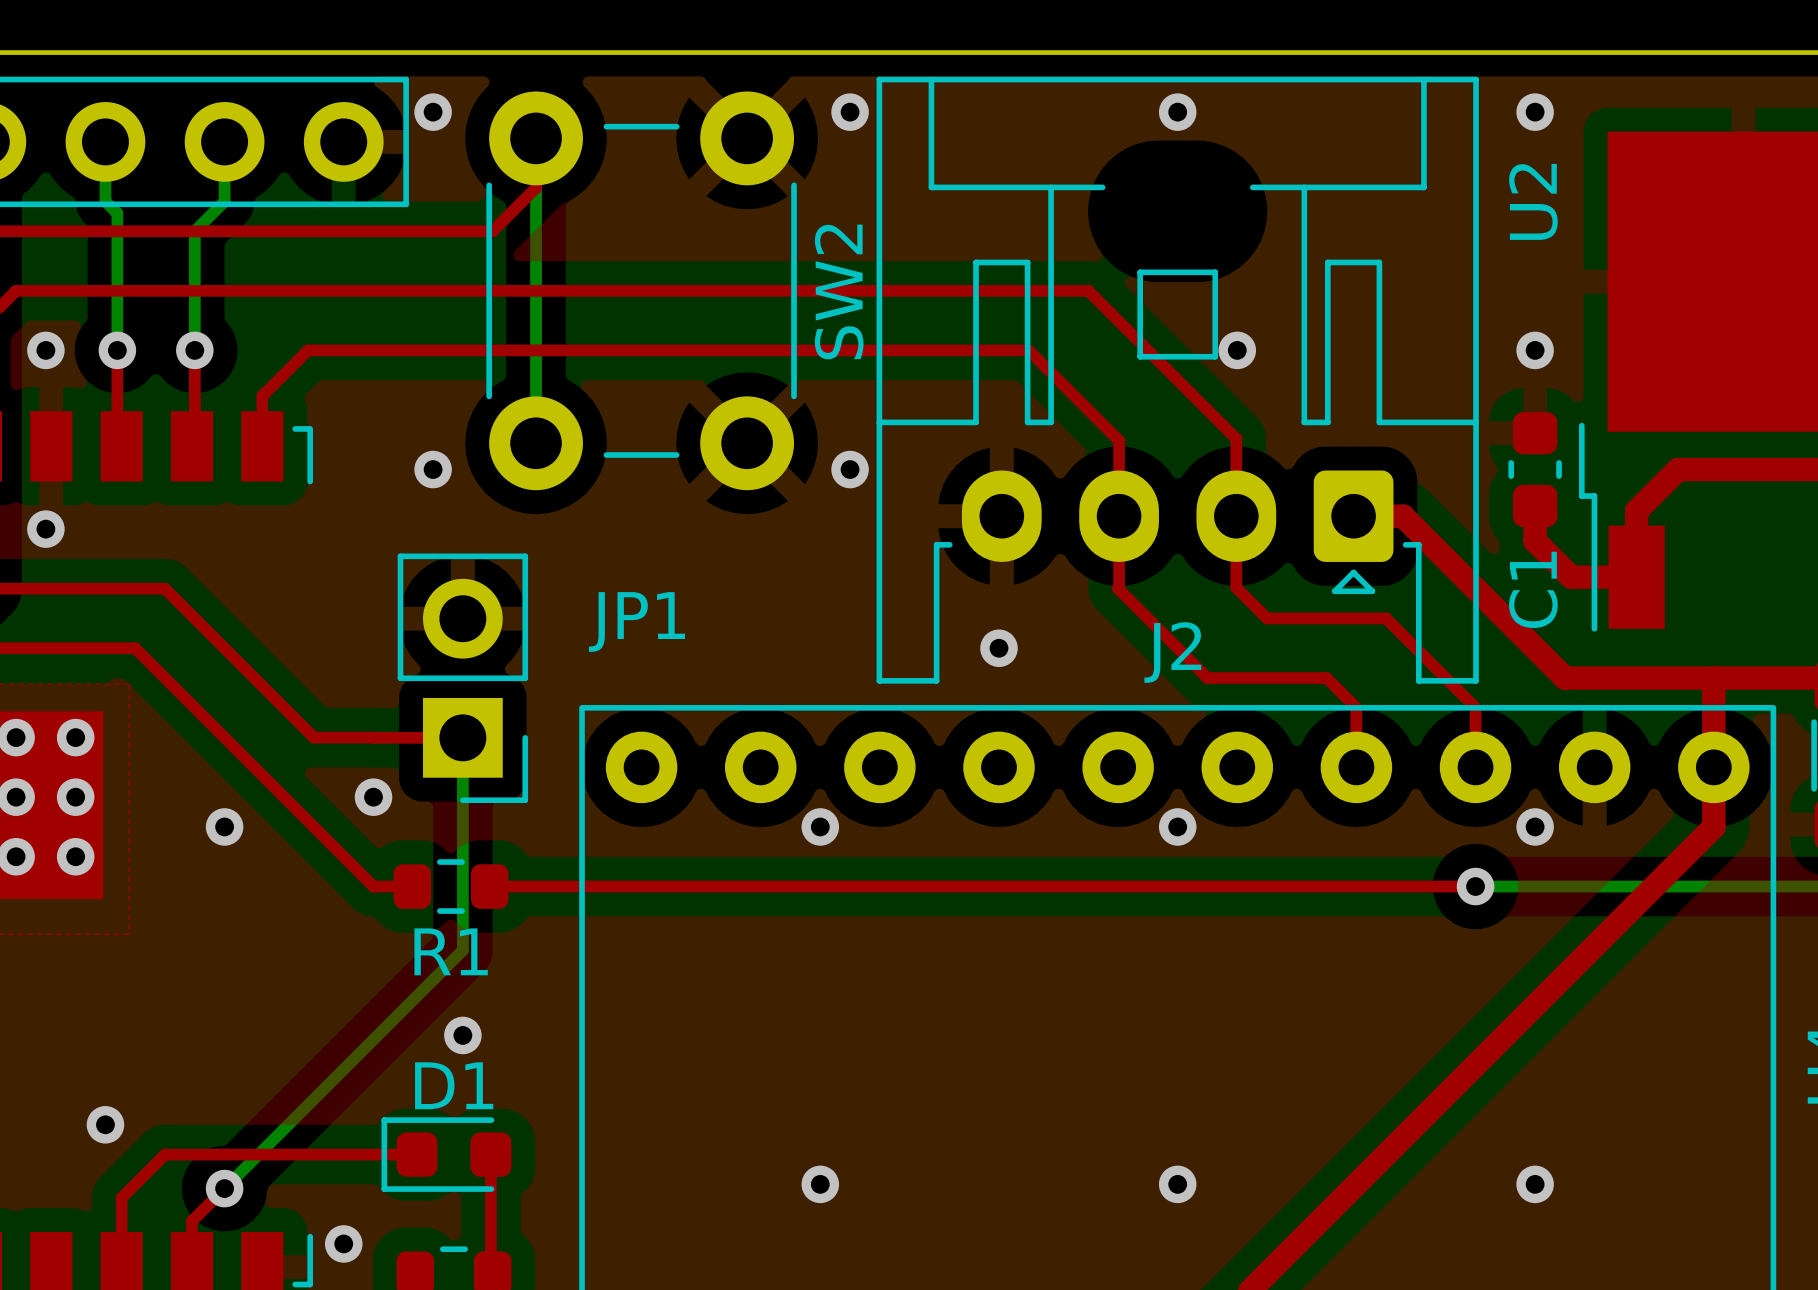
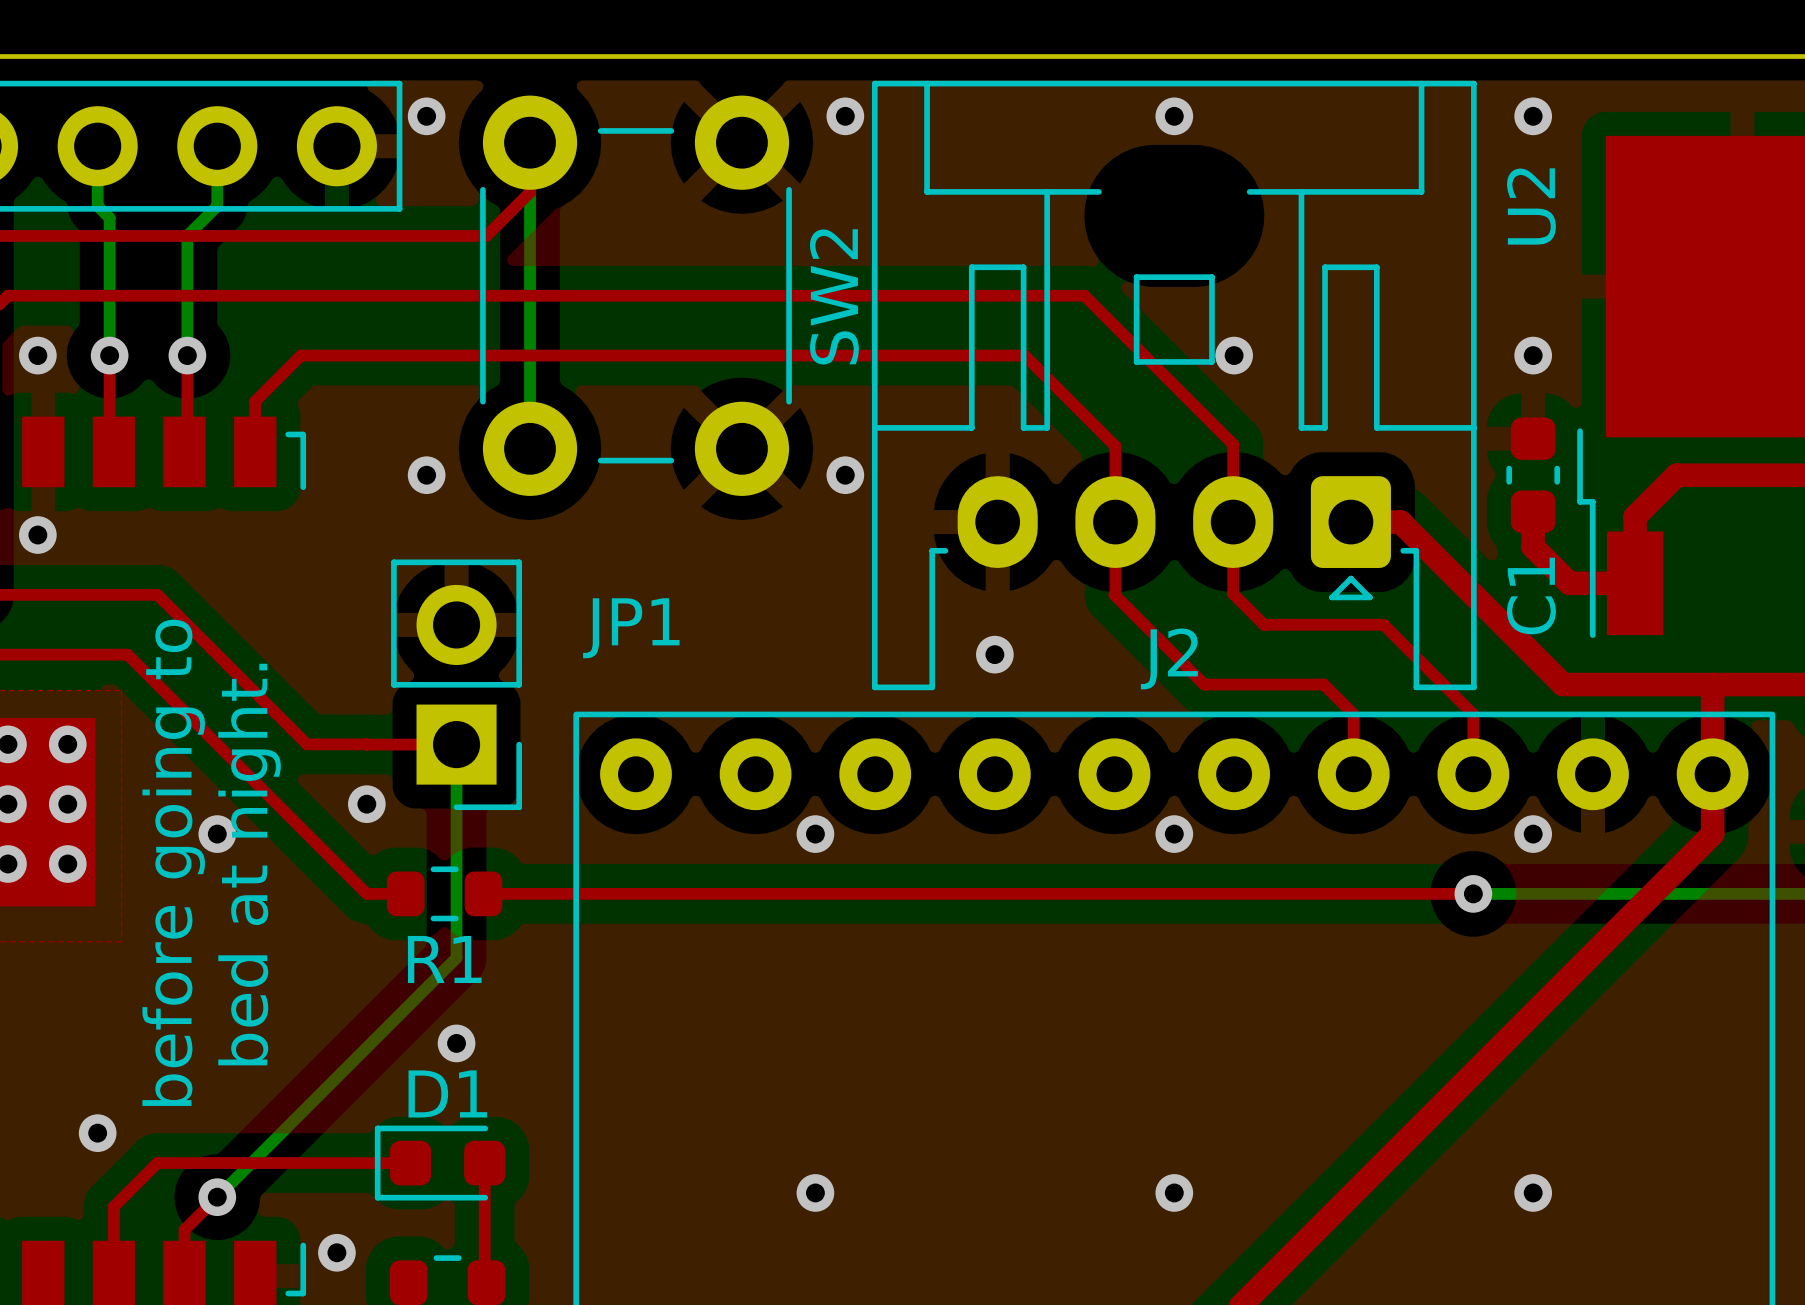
text: none -> before going to (173, 862)
text: none -> bed at night. (249, 864)

